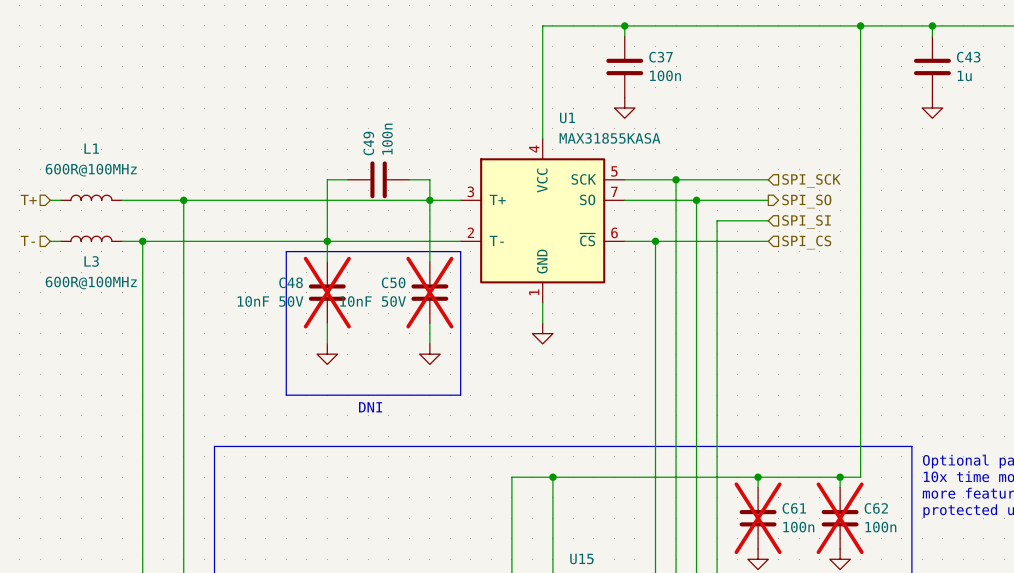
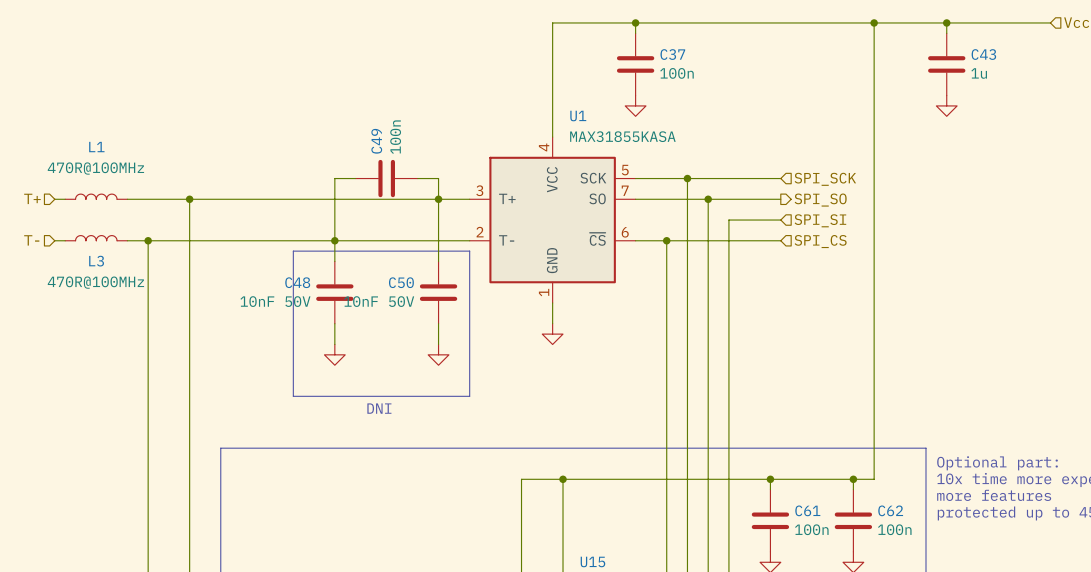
L1 value: 600R@100MHz (91, 170) -> 470R@100MHz (95, 168)
L3 value: 600R@100MHz (91, 282) -> 470R@100MHz (95, 282)
C48 do-not-place cross: (327, 292) -> none
C50 do-not-place cross: (429, 292) -> none
C61 do-not-place cross: (758, 518) -> none
C62 do-not-place cross: (840, 518) -> none

